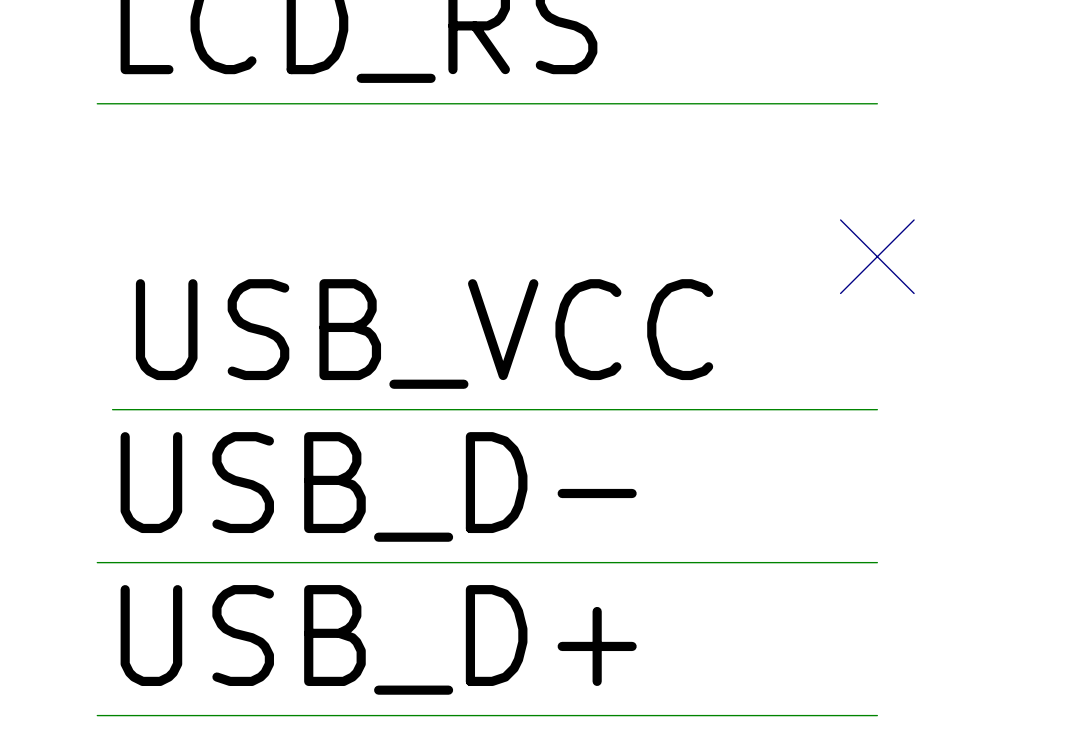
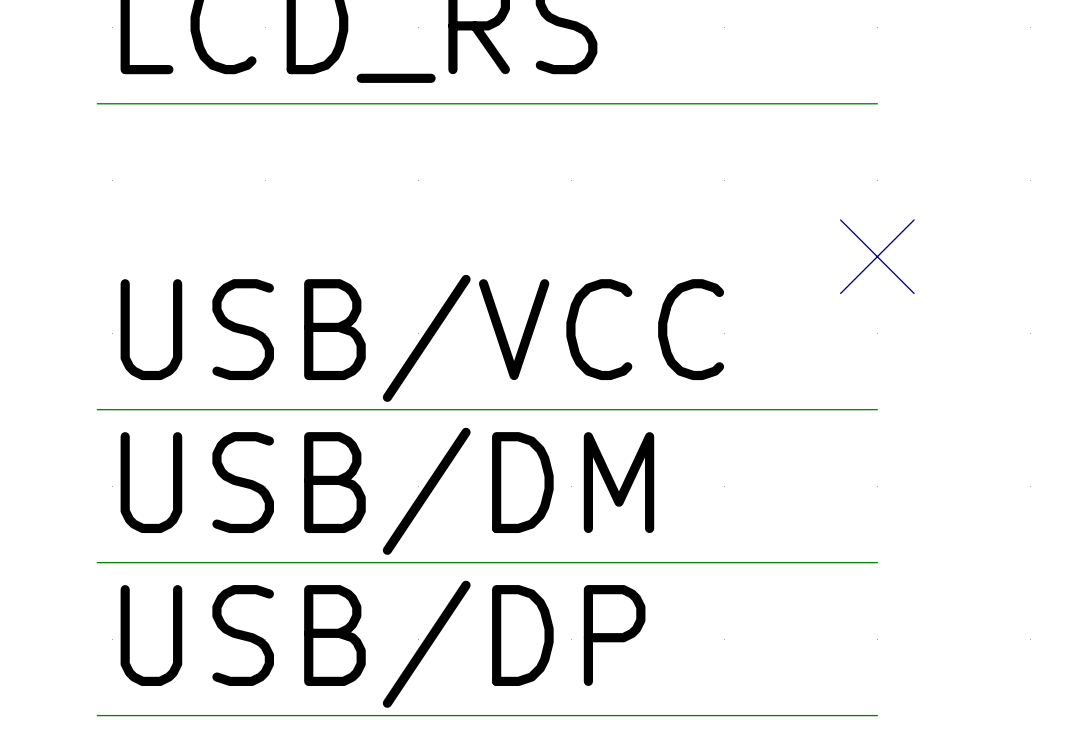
label: USB_VCC (424, 333) -> USB/VCC (422, 338)
wire: none -> (97, 409) (112, 409)
label: USB_D- (378, 486) -> USB/DM (387, 491)
label: USB_D+ (378, 639) -> USB/DP (383, 644)

